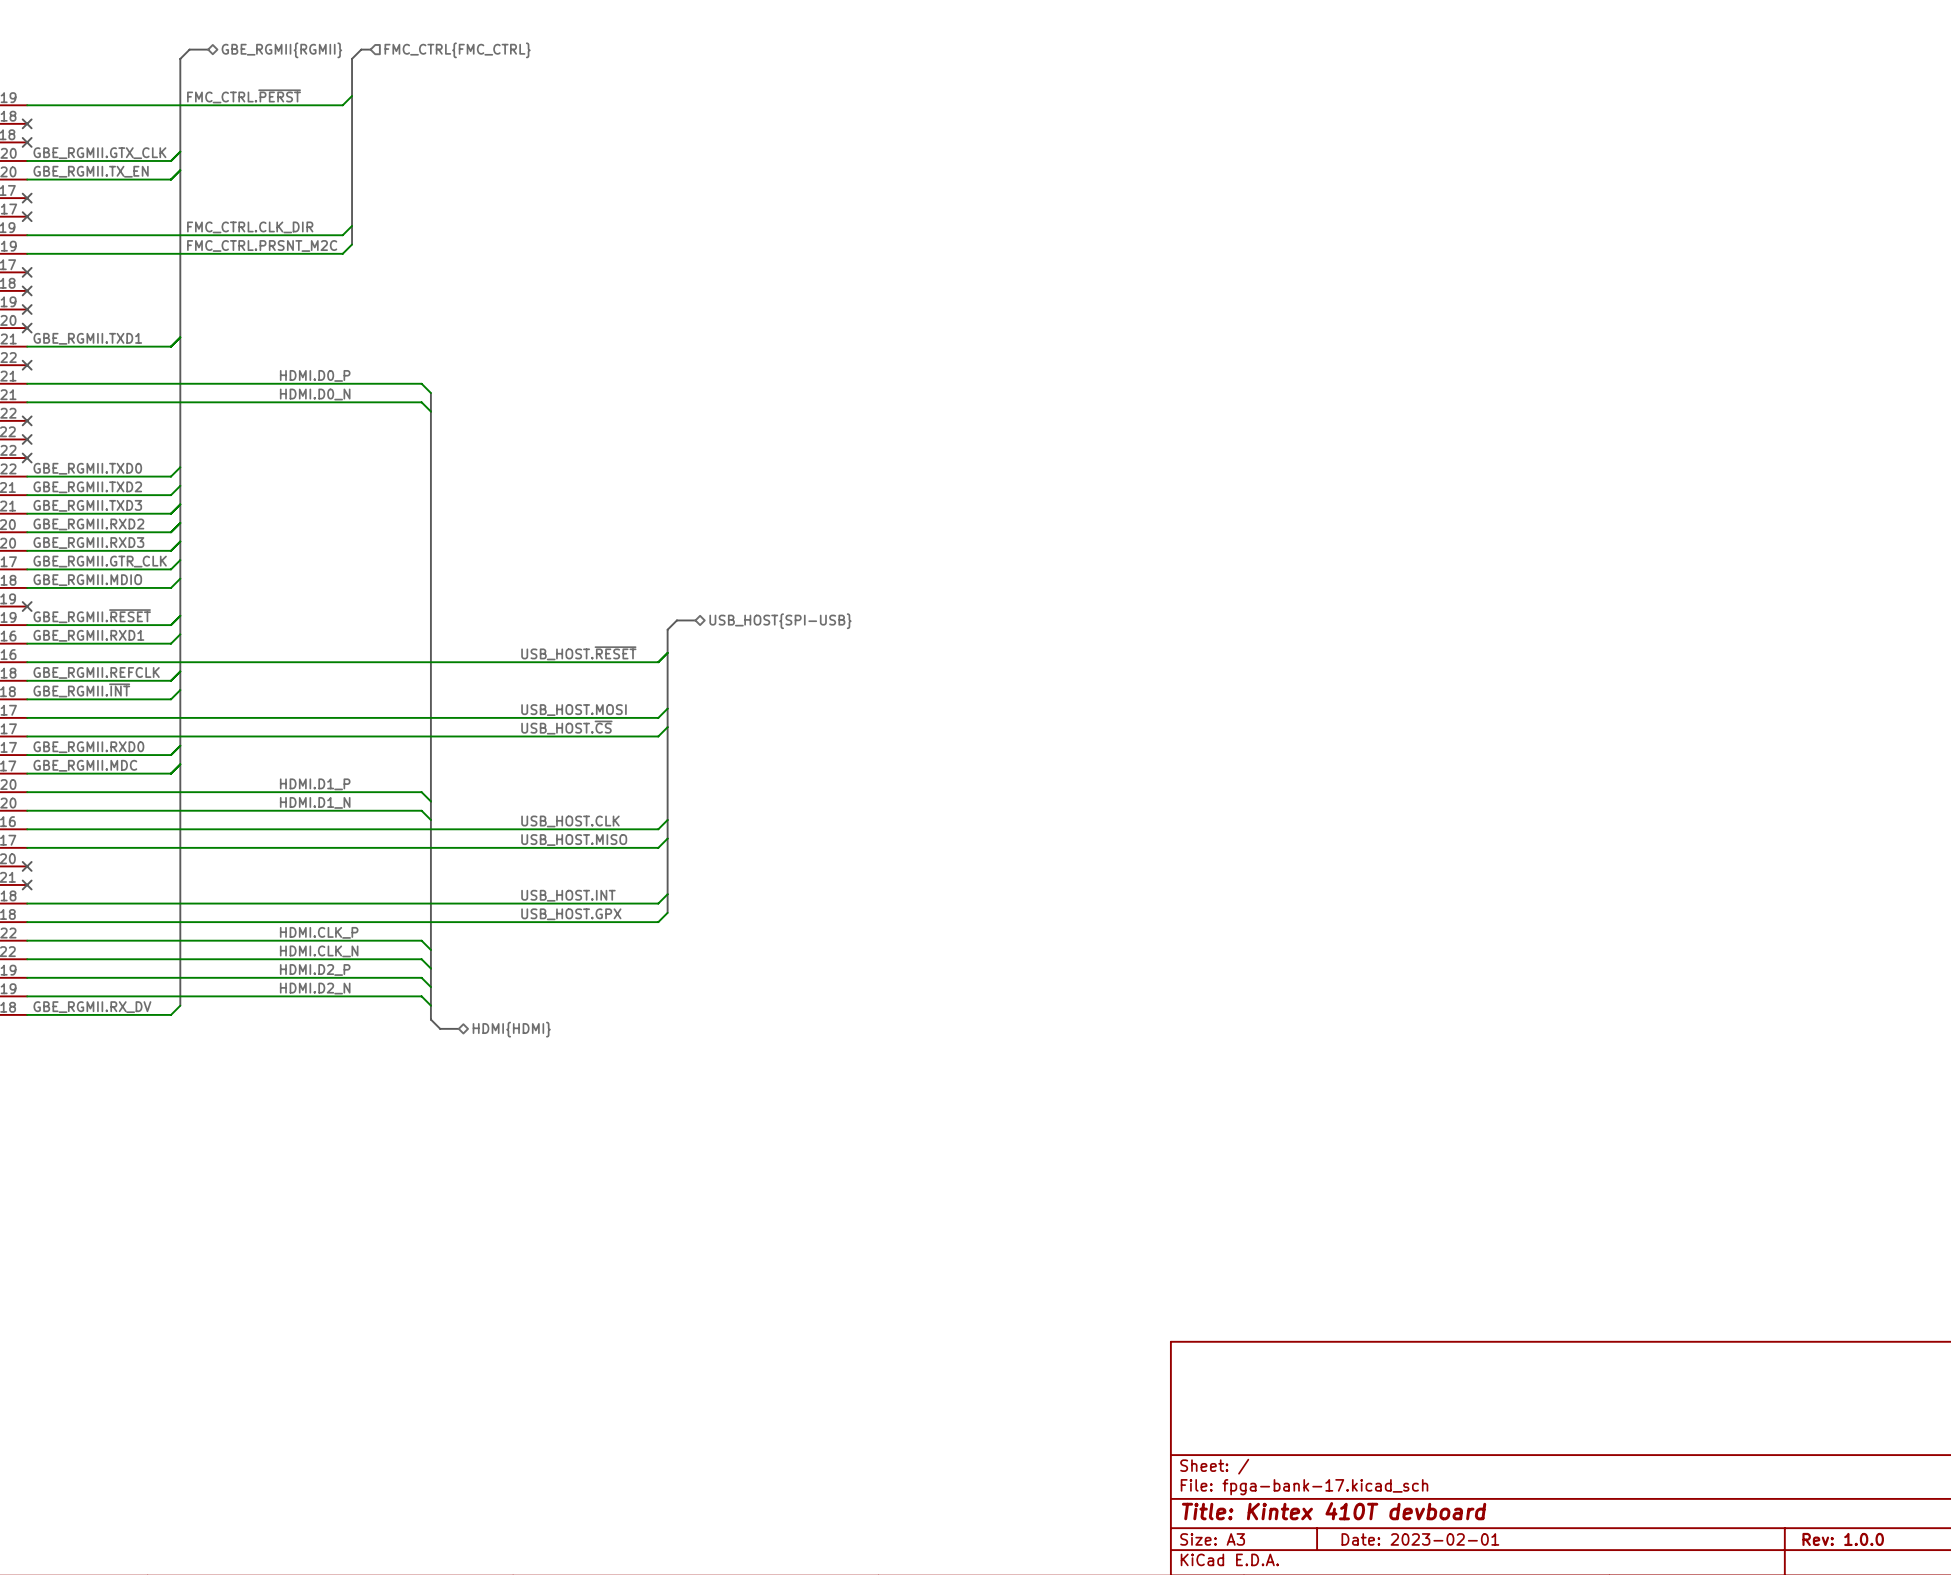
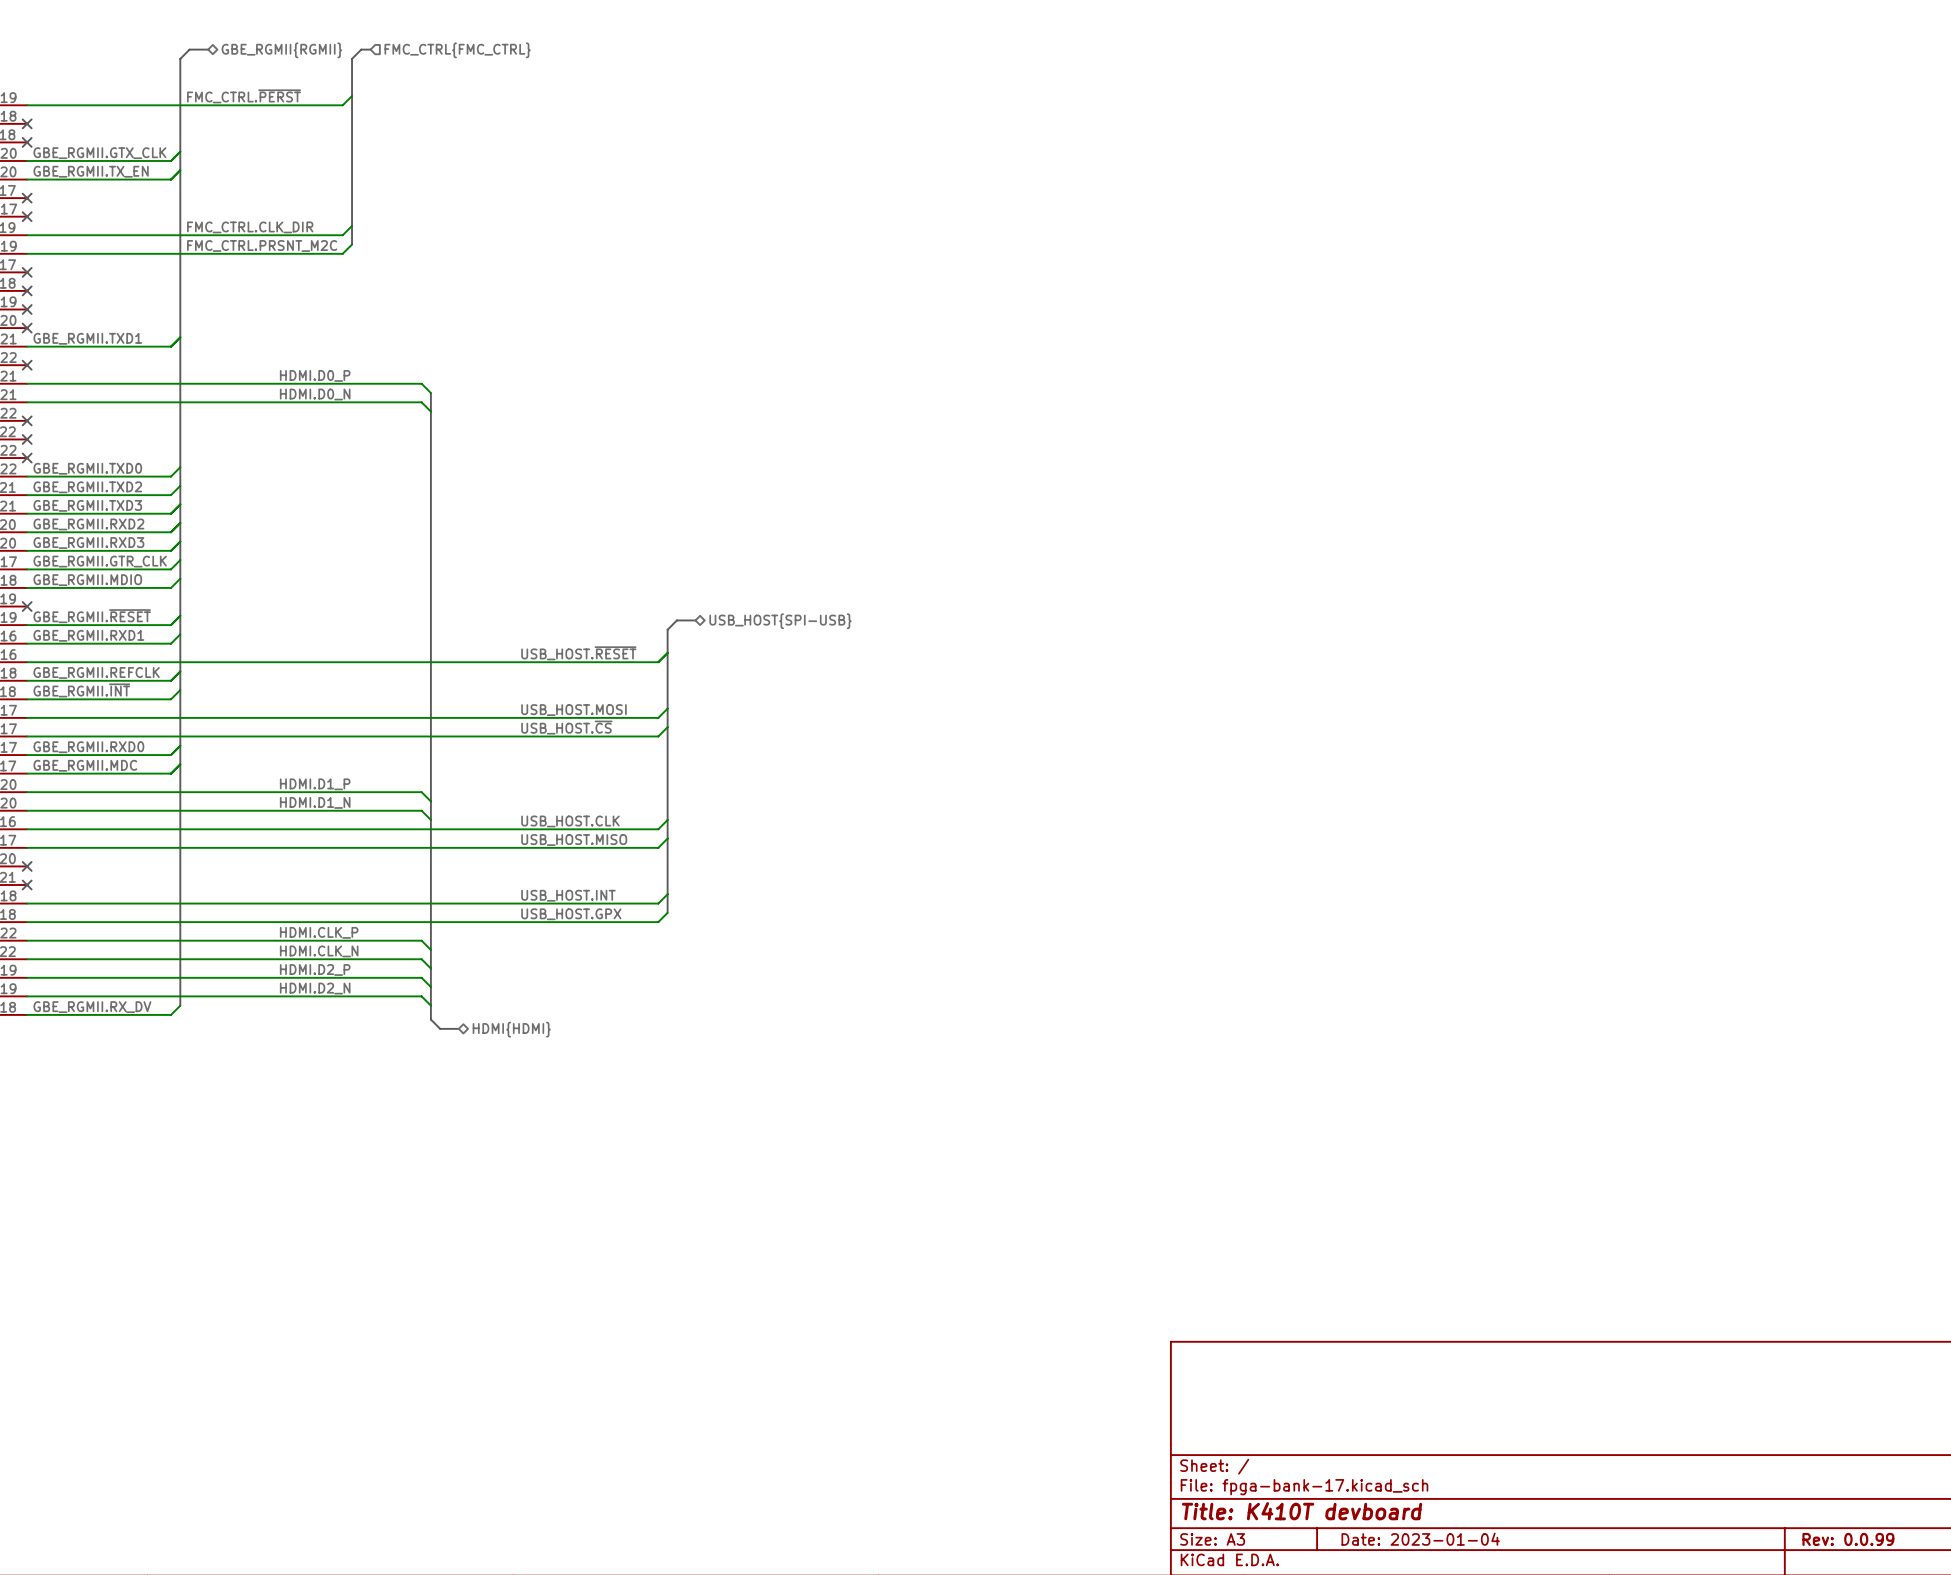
title block: Title: Kintex 410T devboard (1334, 1511) -> Title: K410T devboard (1302, 1511)
title block: Date: 2023-02-01 (1420, 1539) -> Date: 2023-01-04 (1420, 1539)
title block: Rev: 1.0.0 (1843, 1539) -> Rev: 0.0.99 (1848, 1539)

